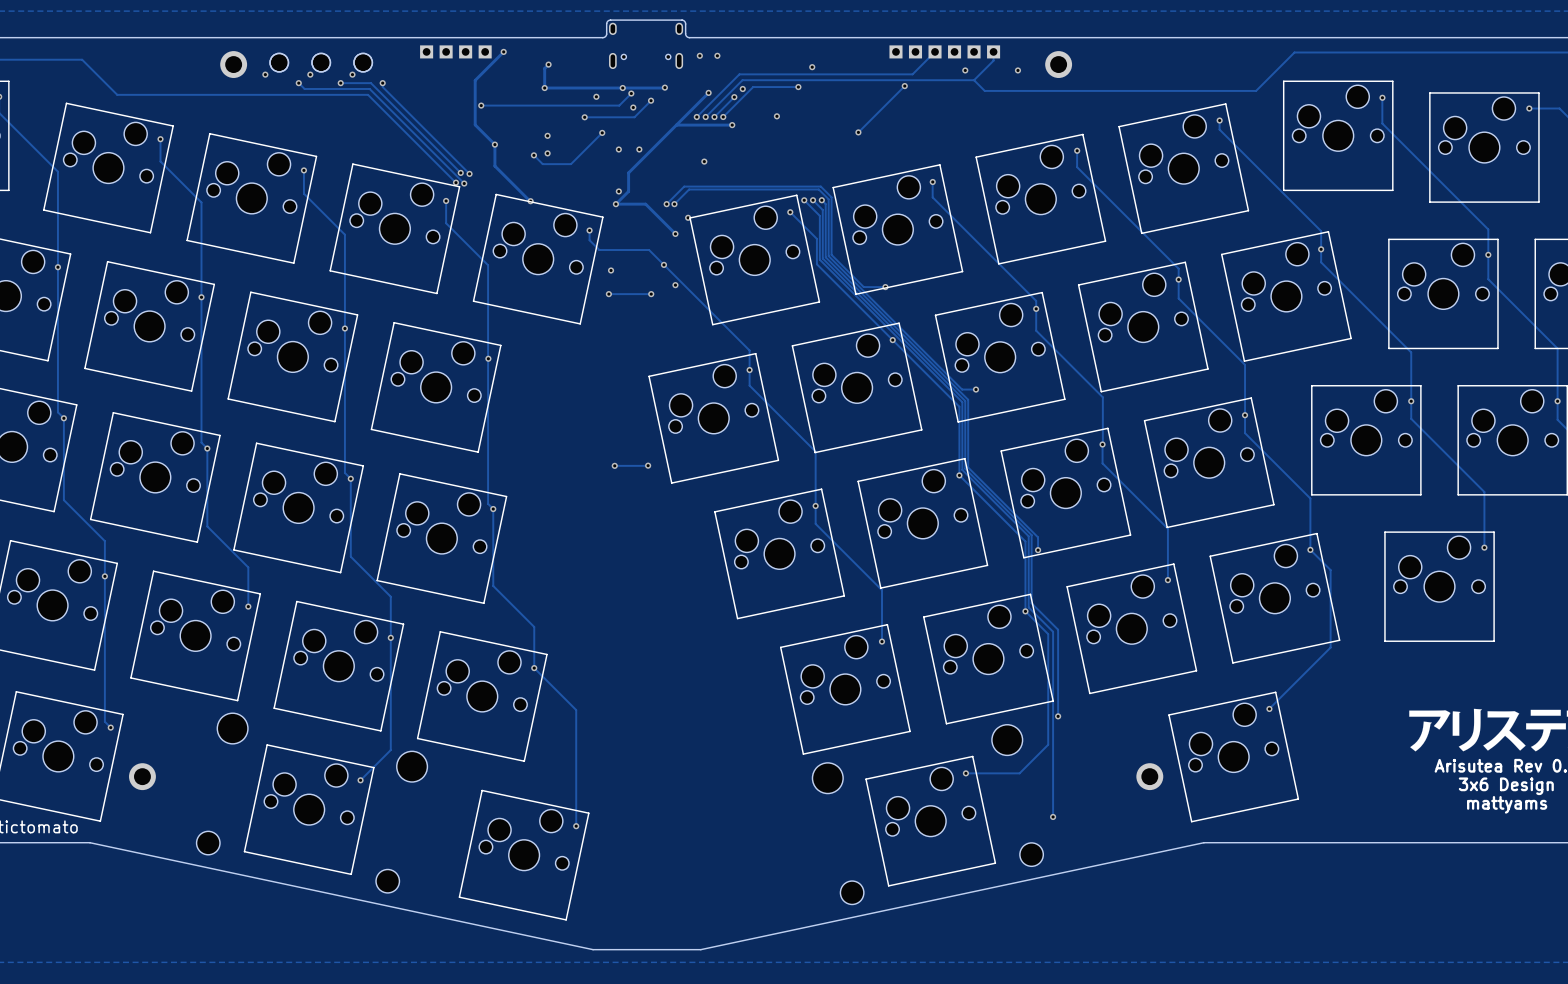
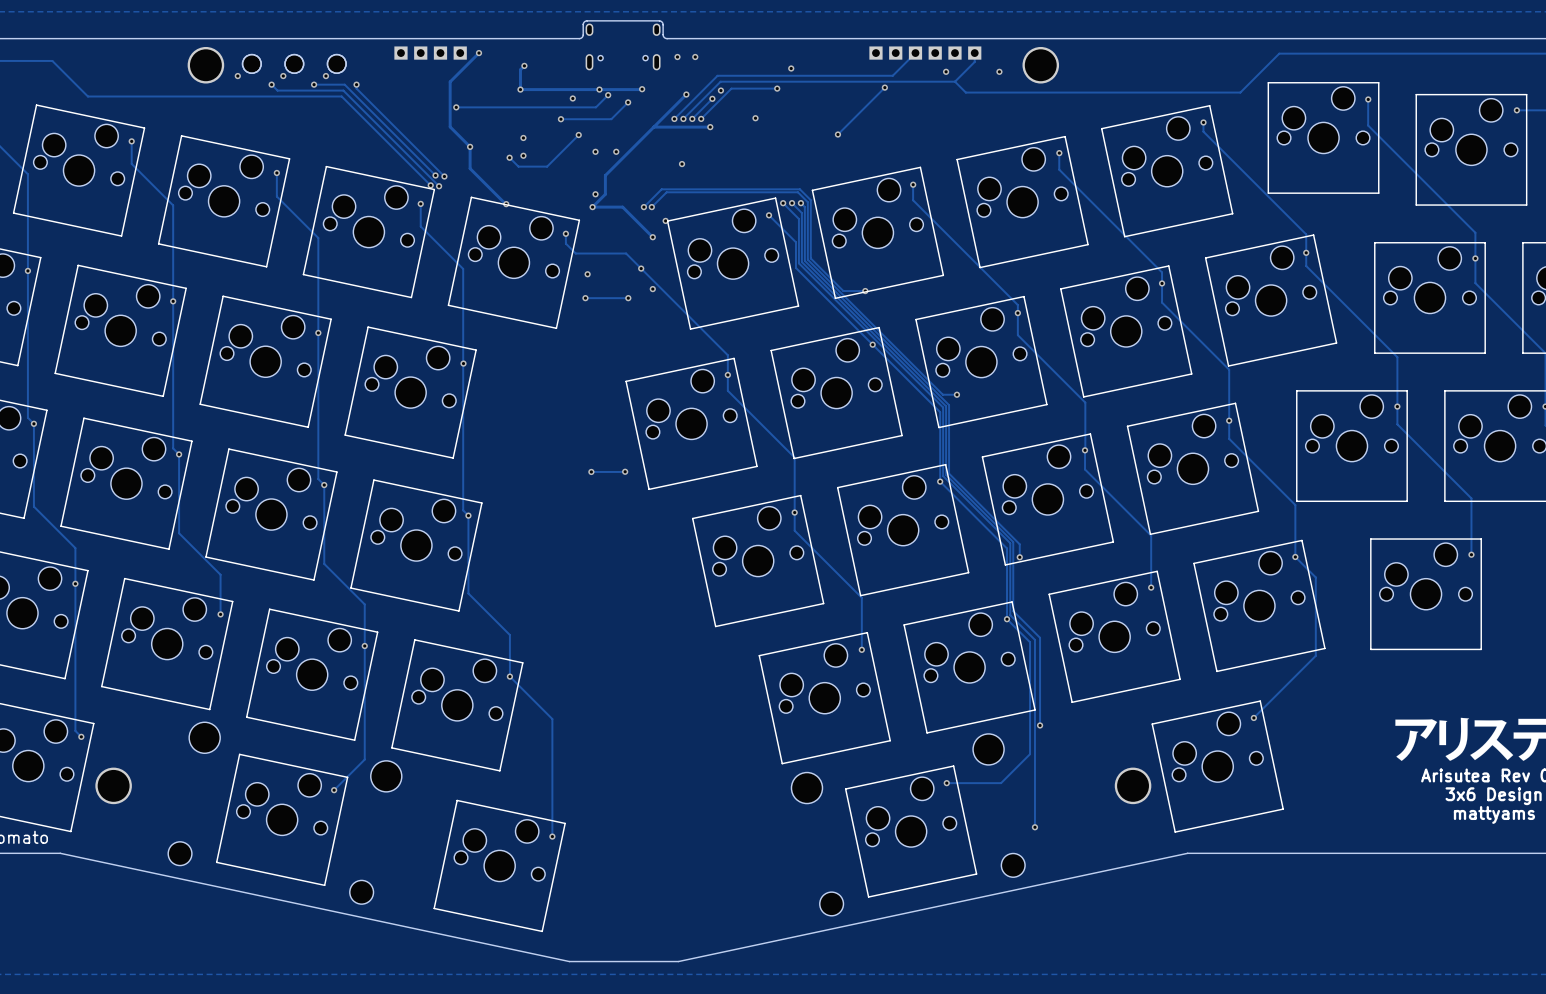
part footprint: [220, 51, 248, 78] -> [187, 46, 225, 84]
part footprint: [1045, 51, 1073, 78] -> [1022, 46, 1060, 84]
via: (633, 107) -> none
part footprint: [129, 763, 156, 791] -> [95, 767, 132, 805]
part footprint: [1136, 763, 1164, 791] -> [1114, 767, 1152, 805]

